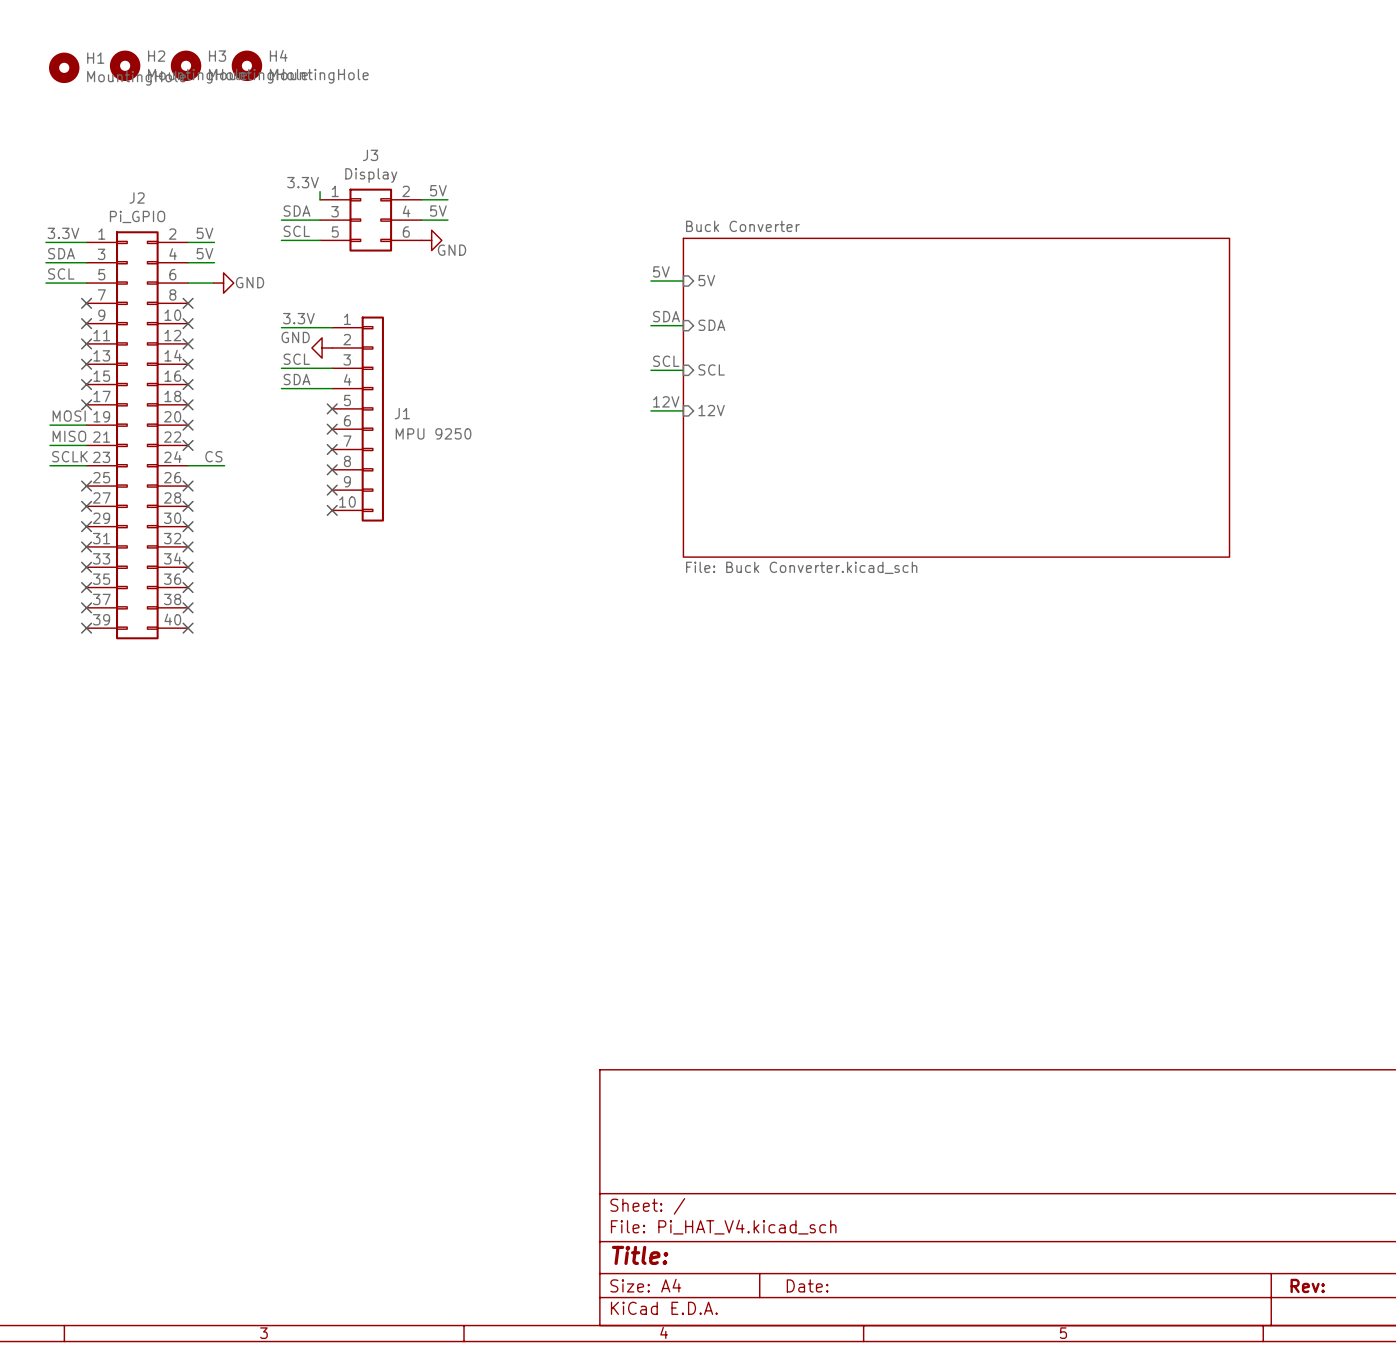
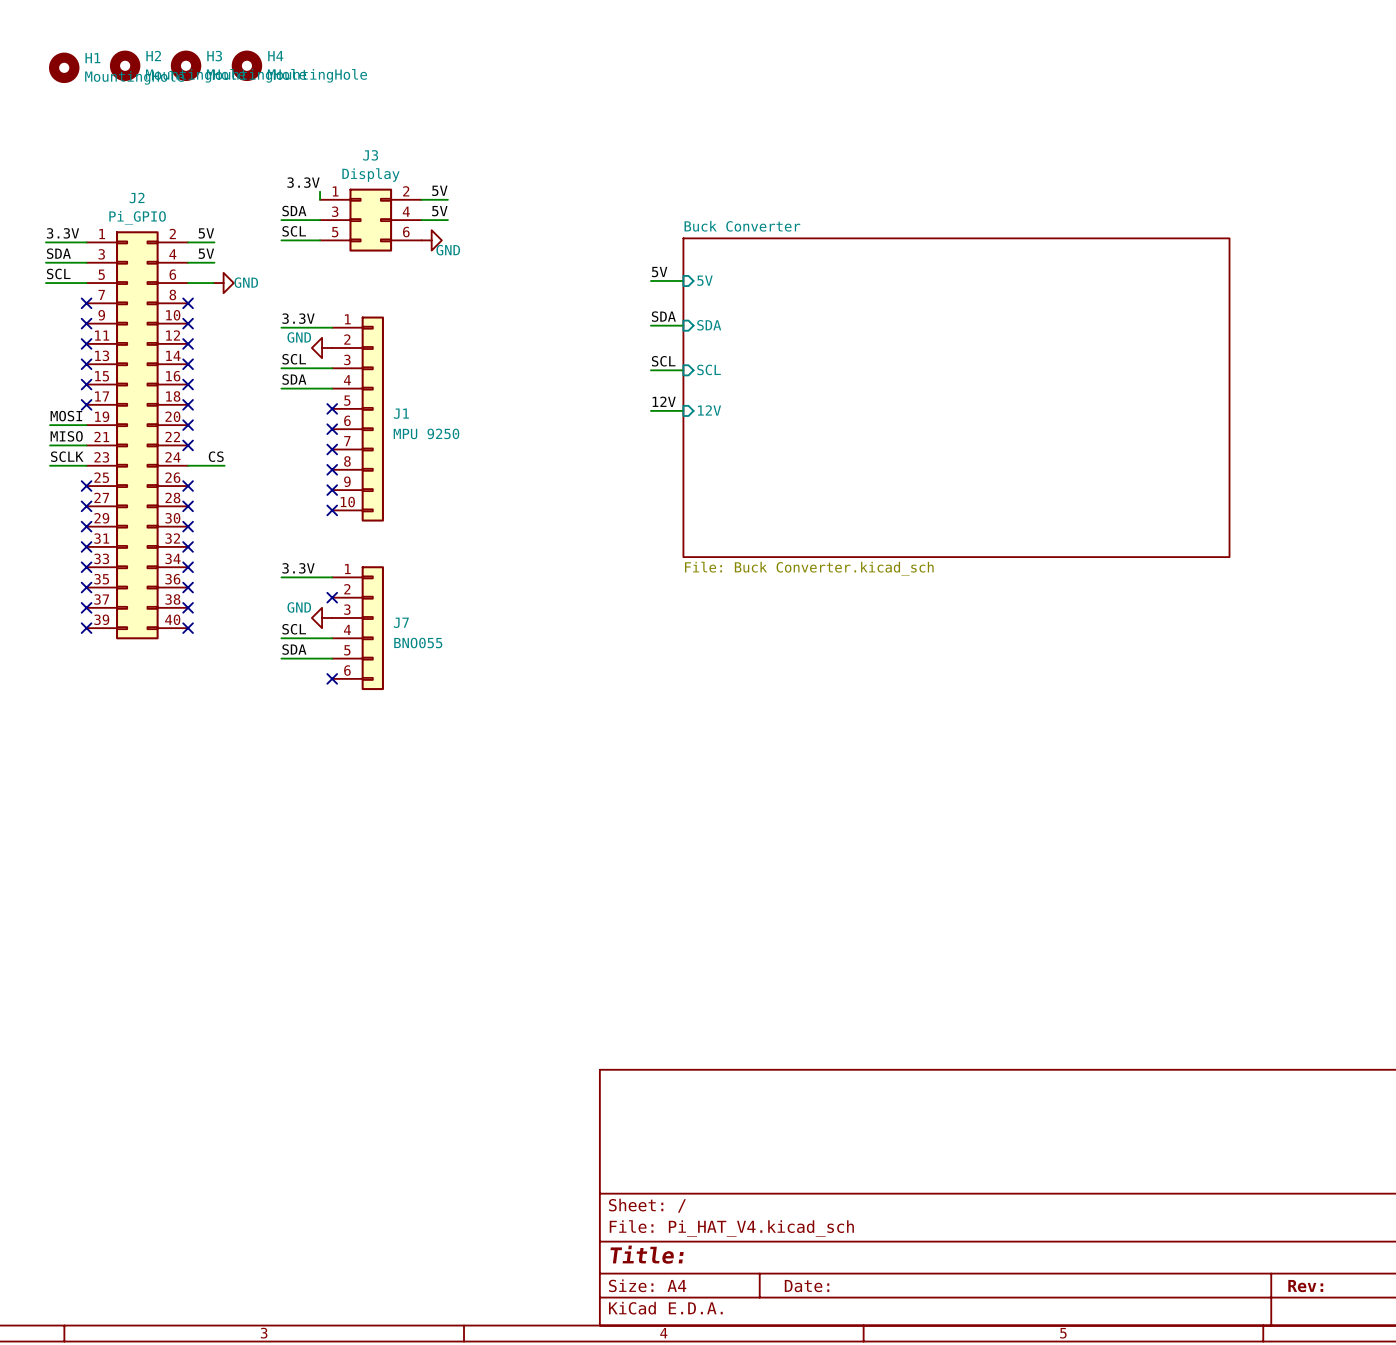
label: none -> 3.3V (298, 568)
wire: none -> (281, 577) (332, 577)
no-connect mark: none -> (332, 597)
power symbol: none -> GND (322, 618)
J7: none -> BNO055 (358, 628)
label: none -> SCL (294, 629)
wire: none -> (281, 638) (332, 638)
label: none -> SDA (294, 649)
wire: none -> (281, 658) (332, 658)
no-connect mark: none -> (332, 678)

